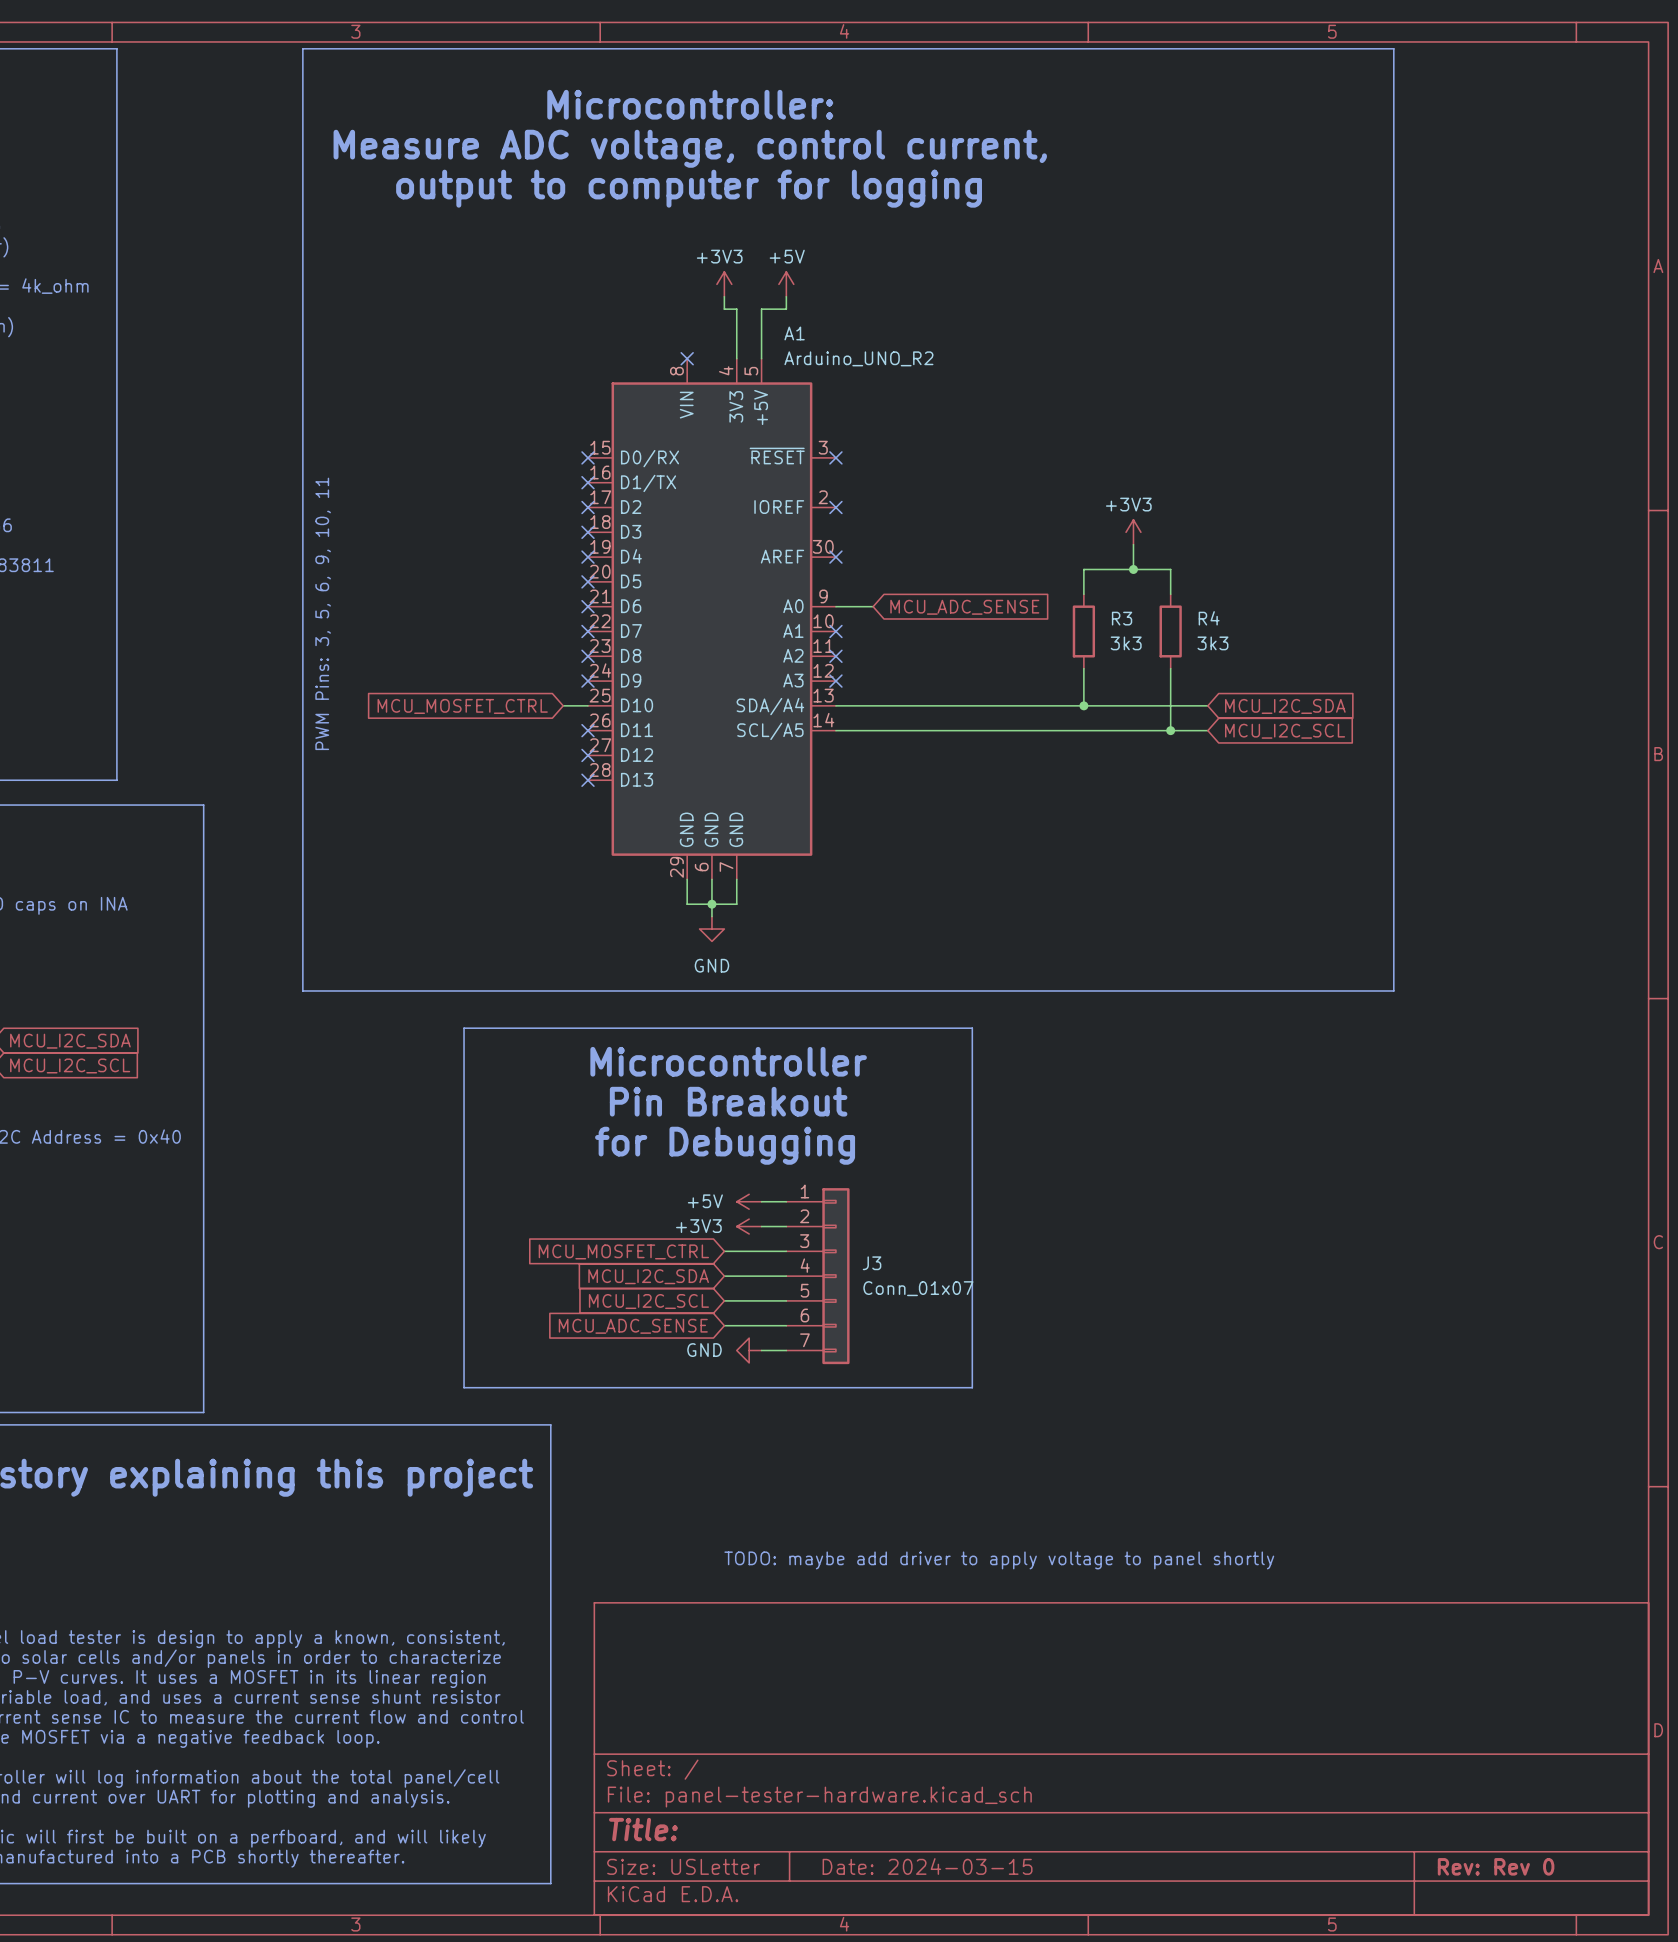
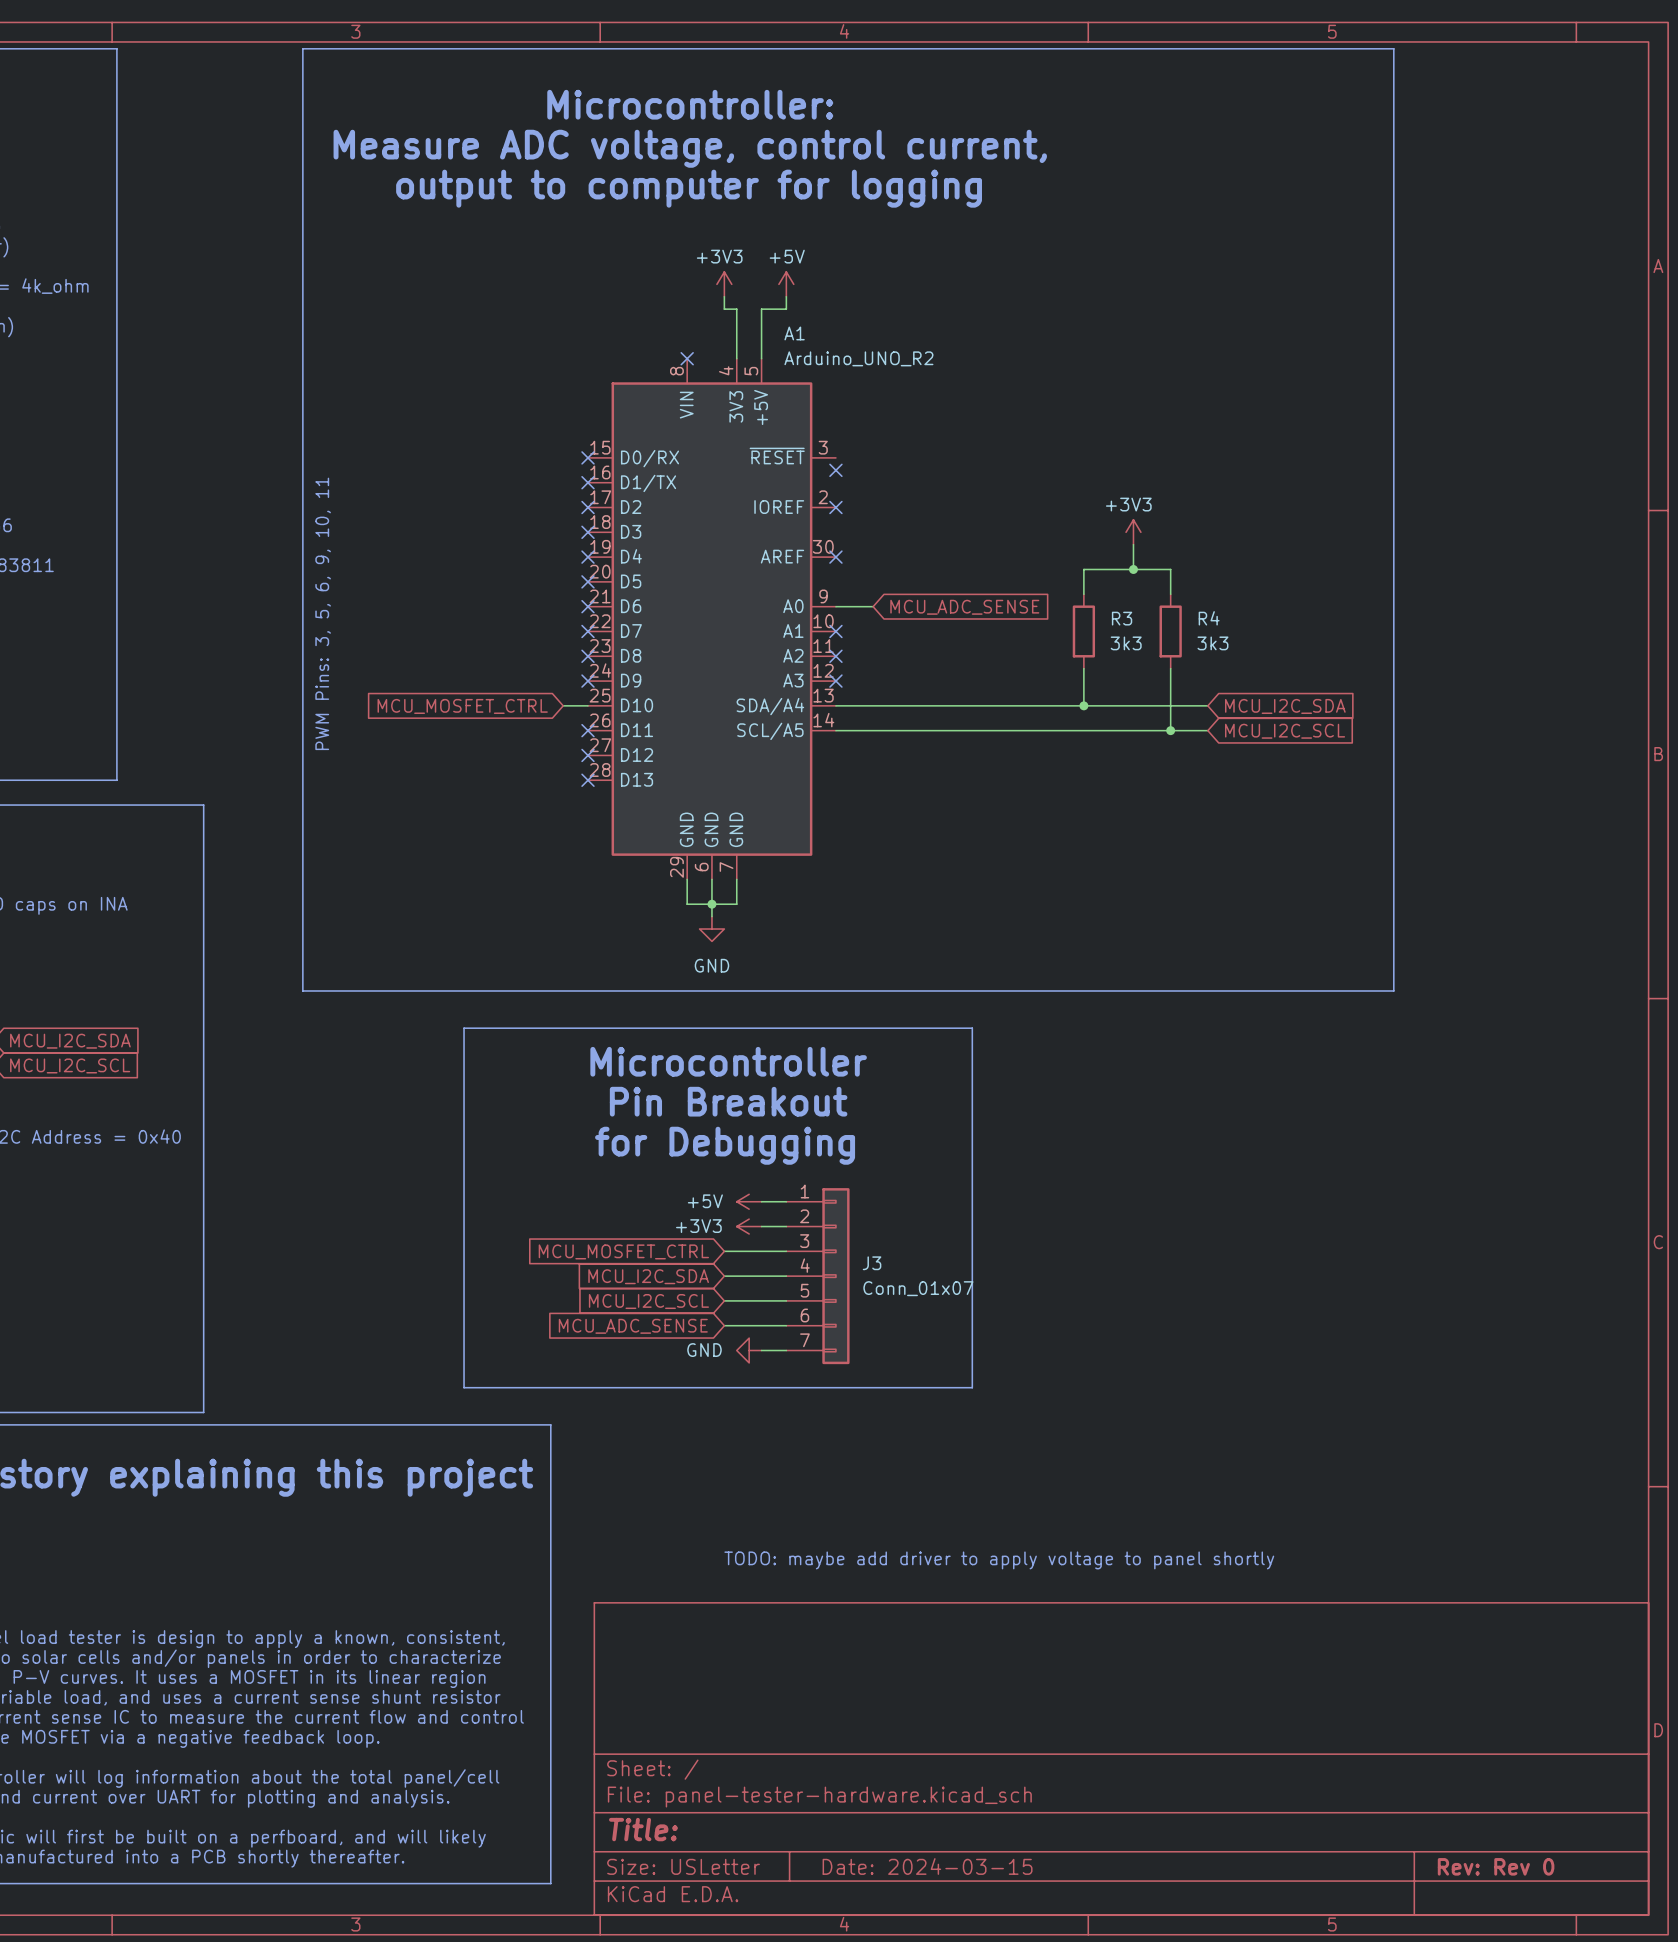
no-connect mark position: (835, 457) -> (835, 470)

